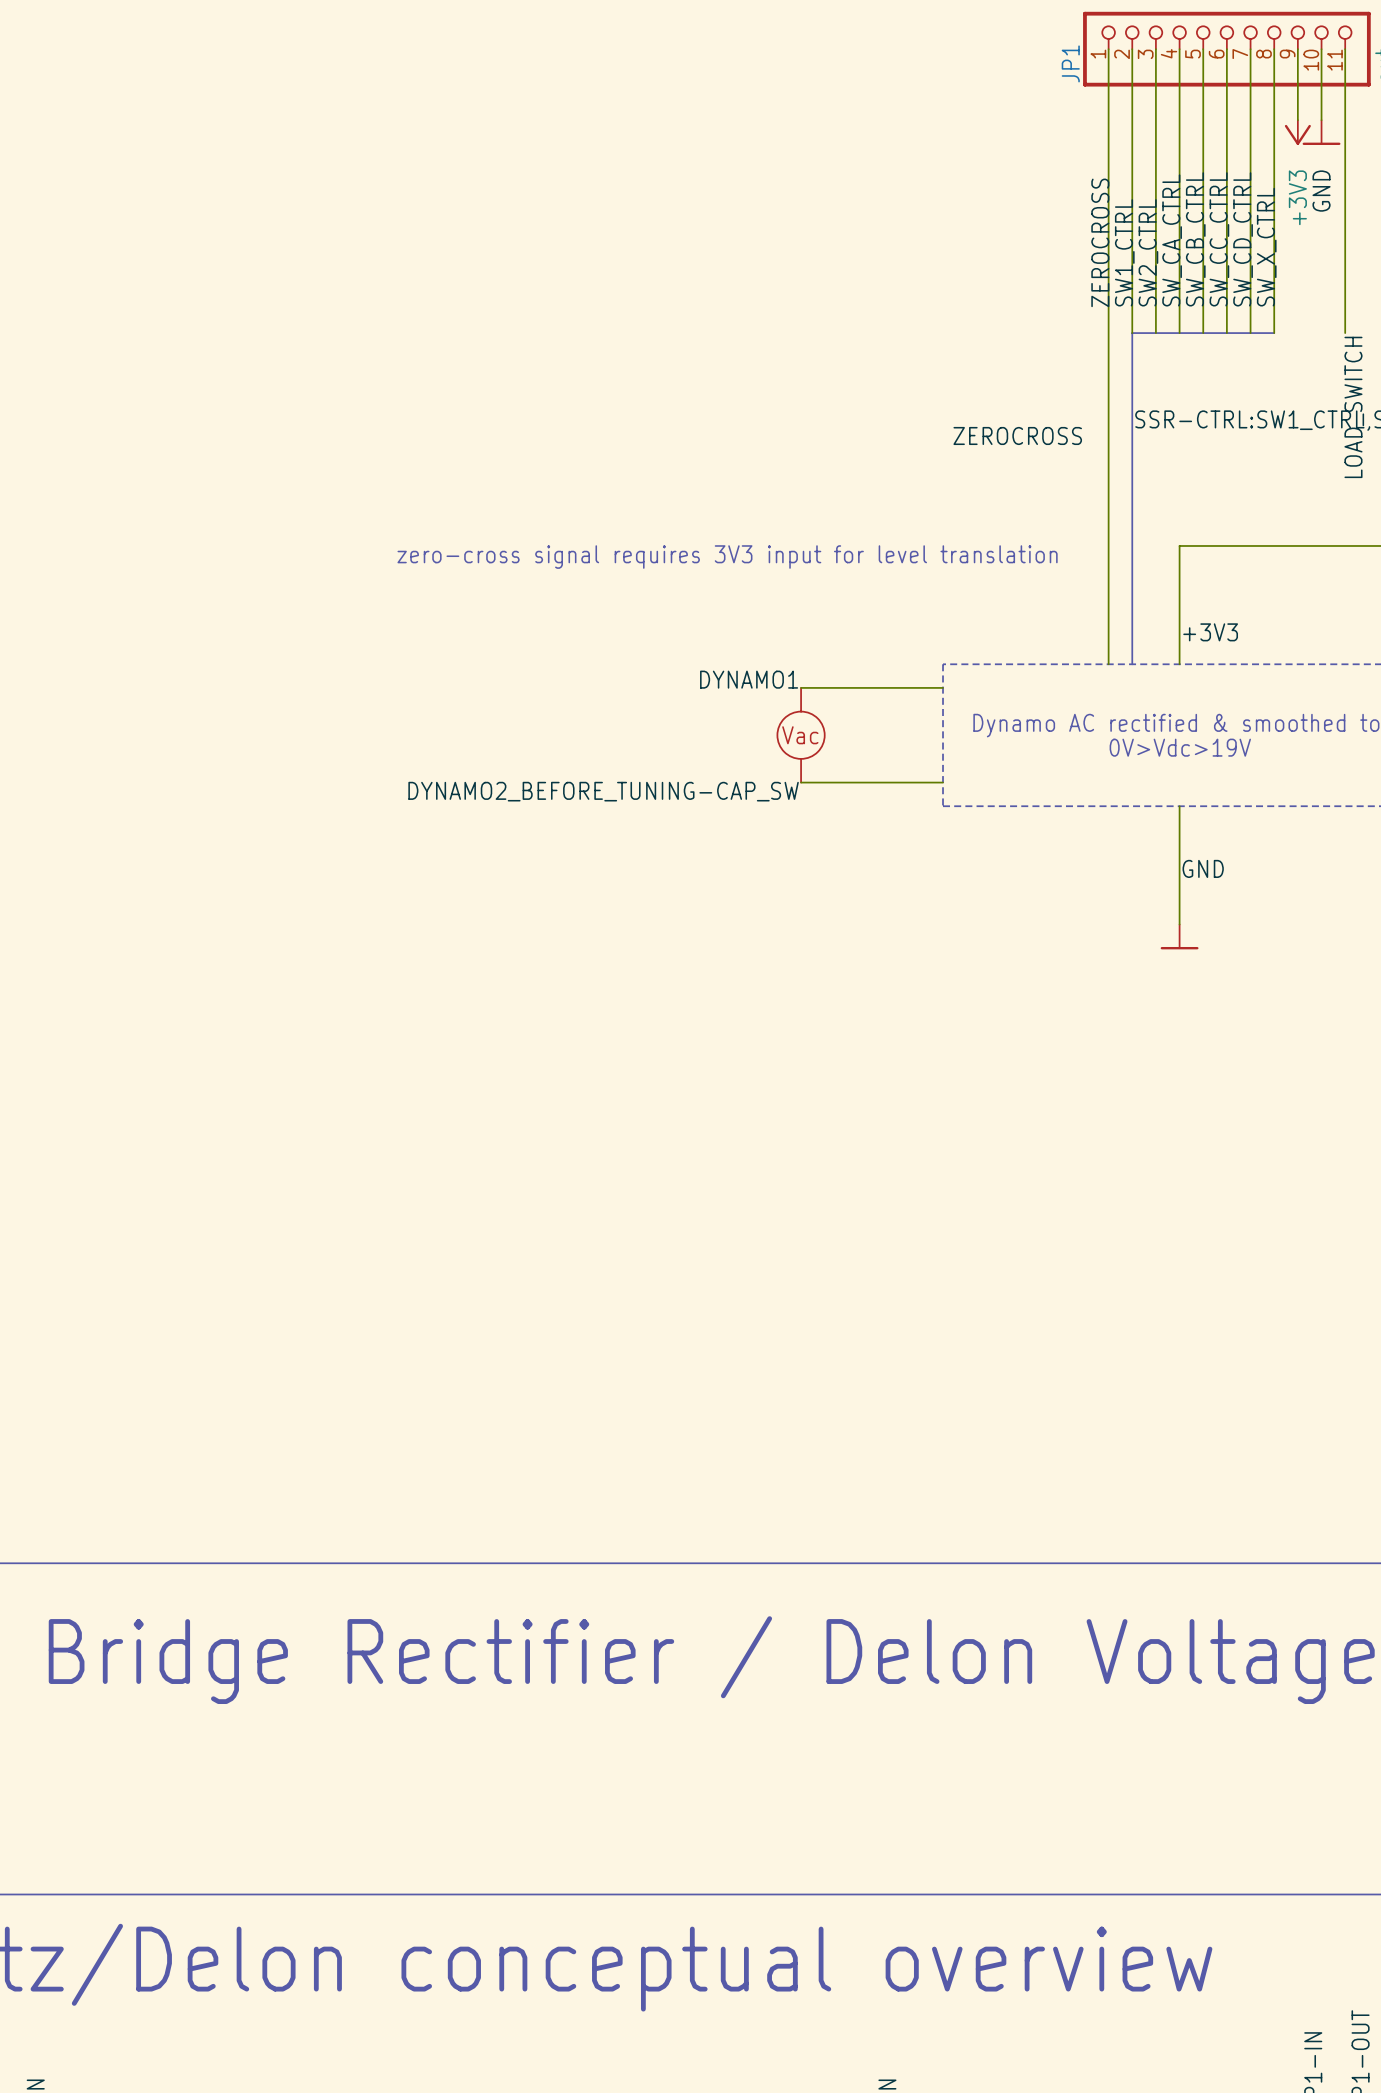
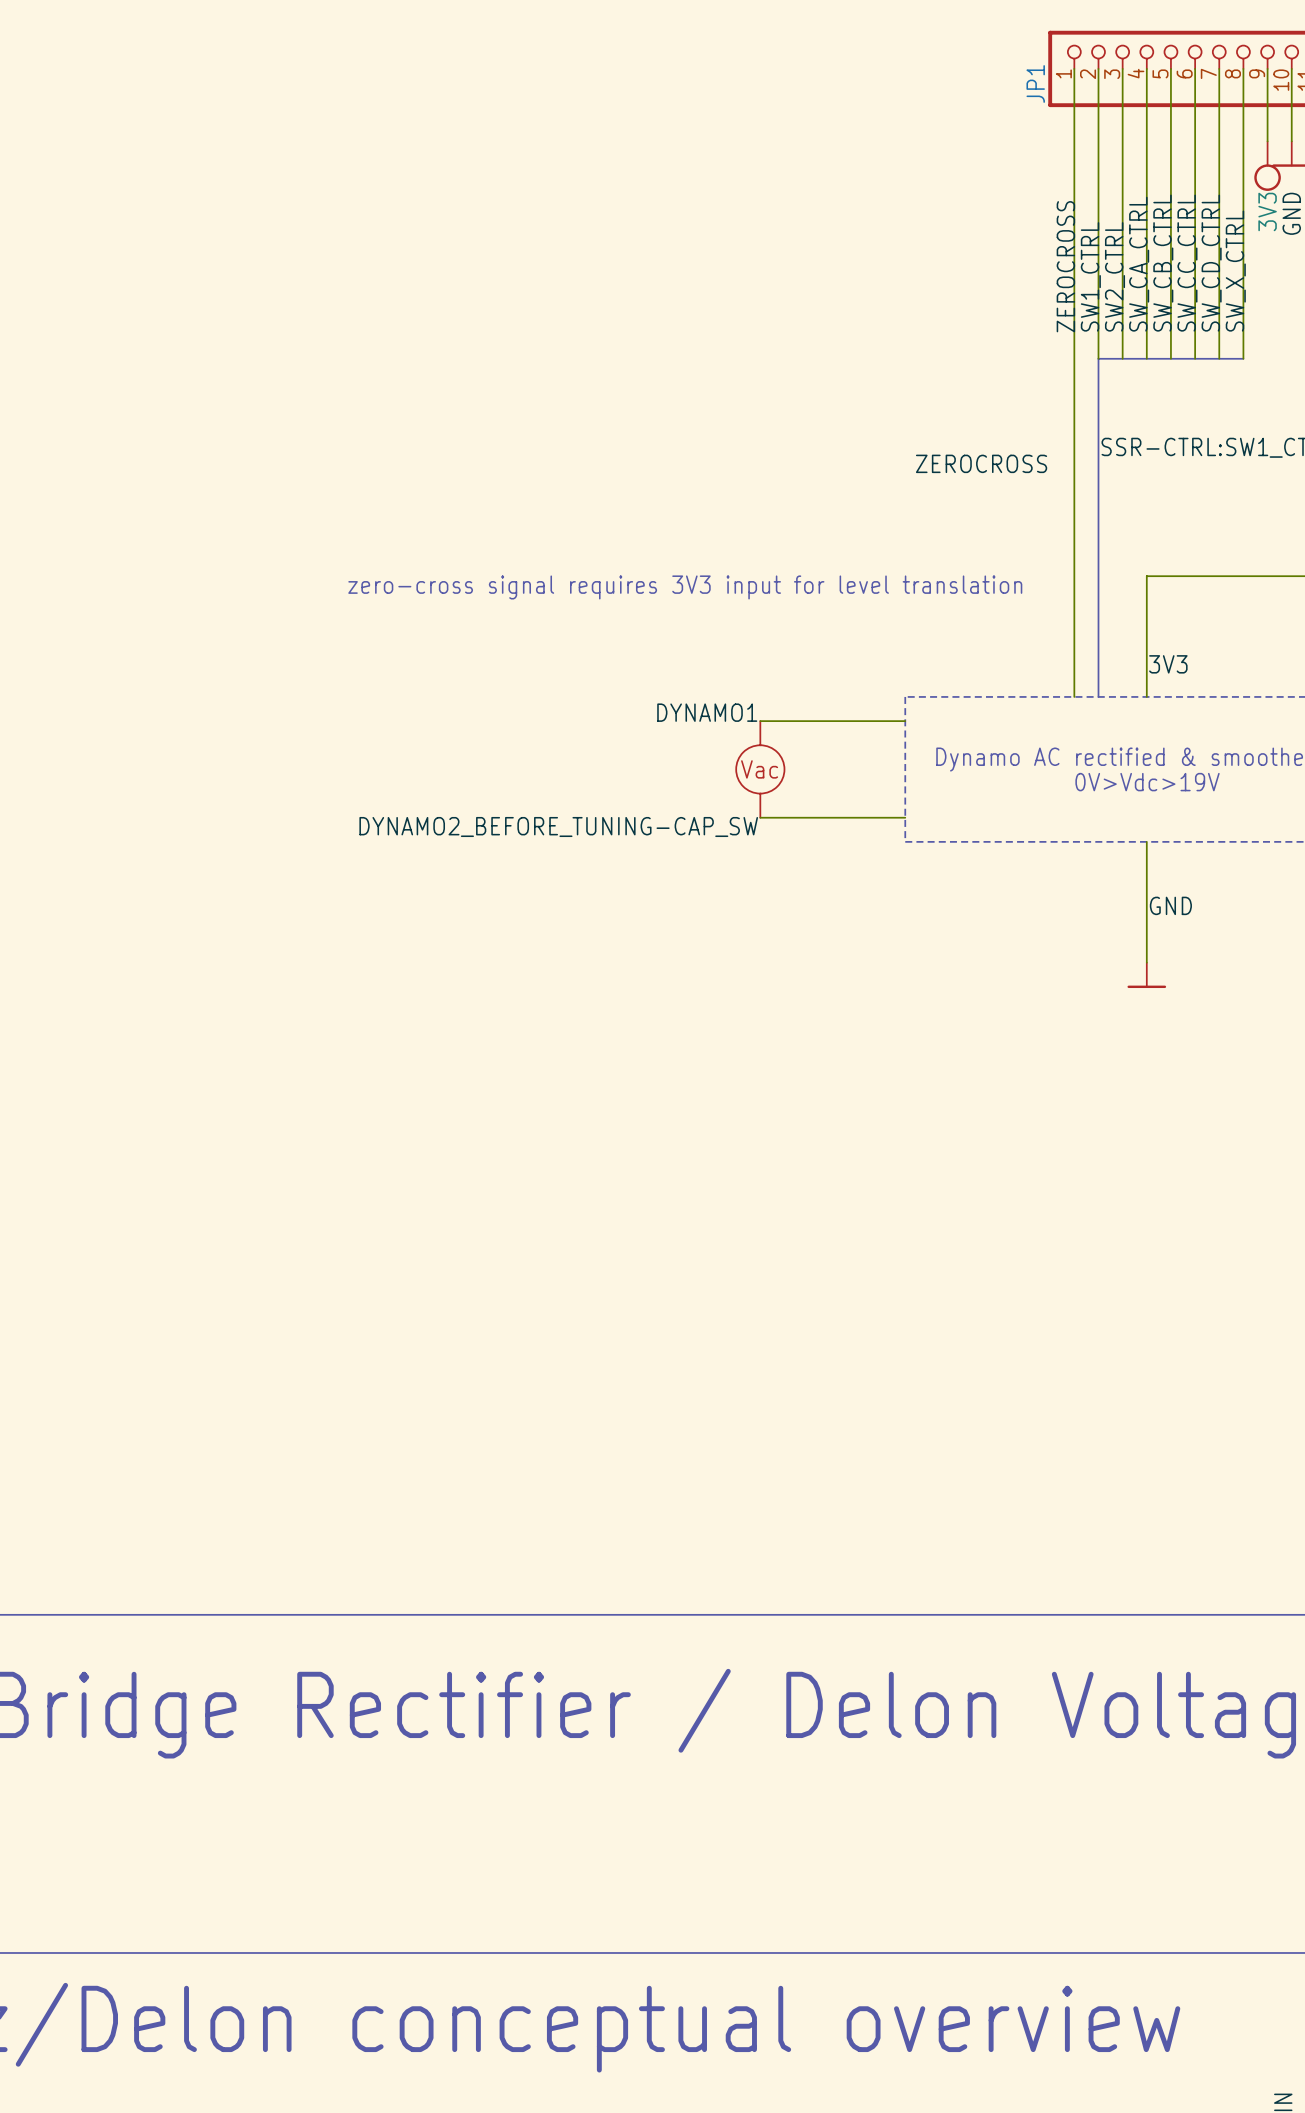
power symbol: +3V3 (1297, 132) -> none
power symbol: none -> 3V3 (1267, 166)
label: +3V3 (1210, 632) -> 3V3 (1168, 664)

